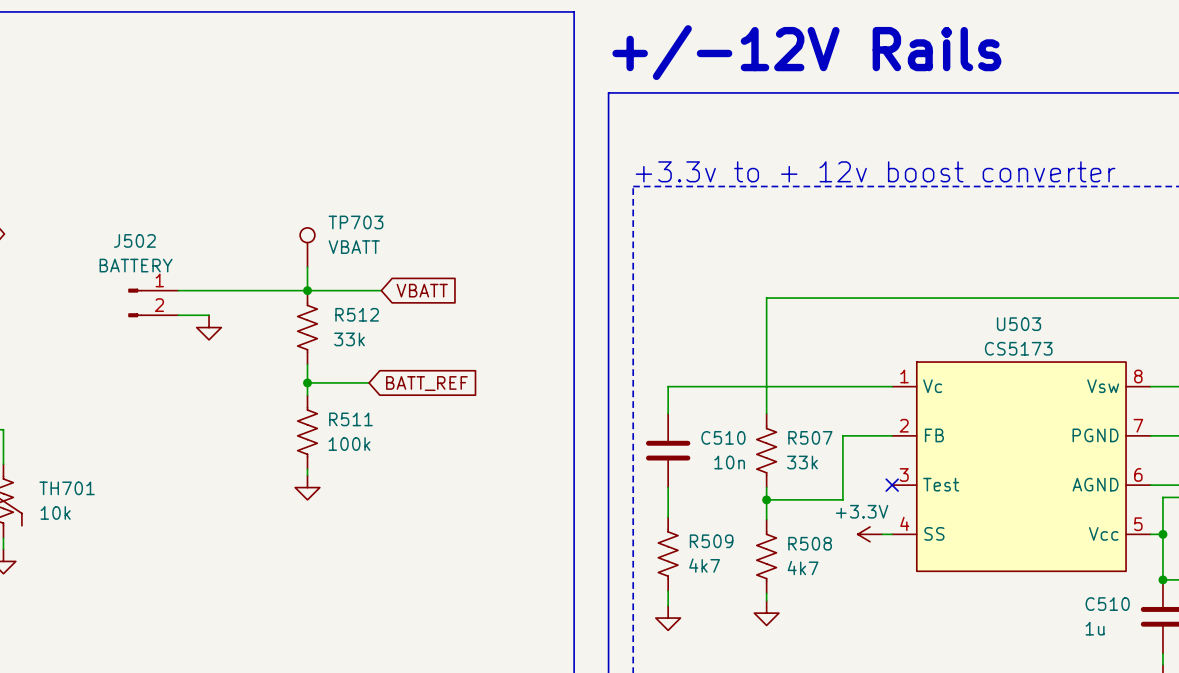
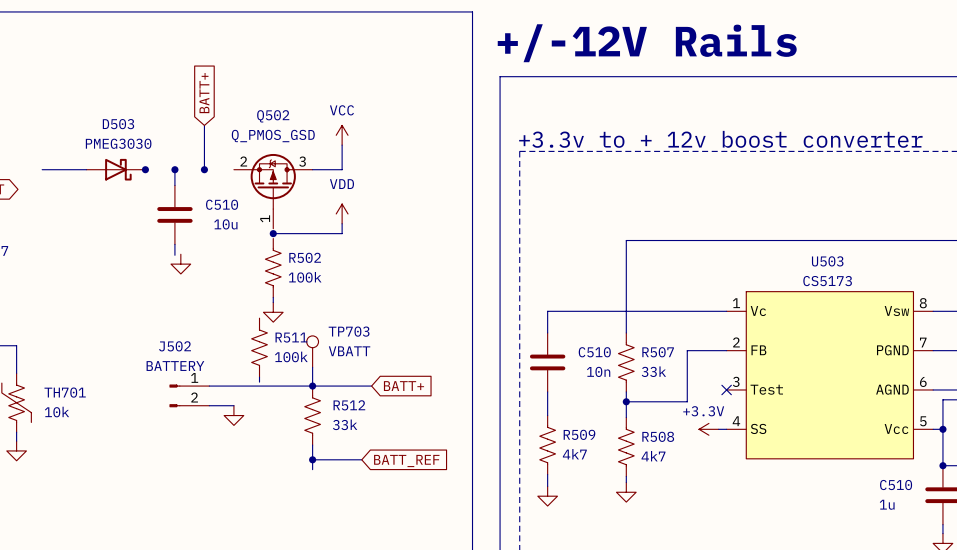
global label: none -> BATT+ (204, 93)
wire: none -> (204, 125) (204, 169)
power symbol: none -> VCC (342, 135)
wire: none -> (342, 145) (342, 169) (312, 169)
wire: none -> (42, 169) (86, 169)
D503: none -> PMEG3030 (115, 169)
junction: none -> (145, 169)
wire: none -> (174, 169) (174, 185)
junction: none -> (174, 169)
junction: none -> (204, 169)
Q502: none -> Q_PMOS_GSD (273, 191)
TP703 position: (307, 247) -> (312, 351)
power symbol: none -> VDD (342, 213)
C510: none -> 10u (174, 214)
wire: (307, 267) (307, 290) -> (312, 367) (312, 386)
wire: none -> (342, 223) (342, 233) (273, 233)
wire: (178, 290) (381, 290) -> (209, 386) (371, 386)
junction position: (307, 290) -> (273, 233)
global label: VBATT (422, 290) -> none
J502 position: (153, 302) -> (189, 395)
wire: none -> (174, 244) (174, 255)
wire: (178, 315) (209, 315) -> (209, 405) (233, 405)
R512 position: (307, 327) -> (312, 415)
R502: none -> 100k (273, 268)
wire: (307, 364) (307, 395) -> (312, 445) (312, 469)
wire: none -> (273, 297) (273, 302)
wire: (307, 382) (369, 382) -> (312, 459) (361, 459)
junction: (307, 382) -> none
global label position: BATT_REF (426, 383) -> BATT_REF (406, 461)
power symbol: none -> (273, 312)
junction: none -> (312, 386)
global label: none -> BATT+ (403, 386)
power symbol position: (307, 487) -> (233, 415)
junction: none -> (312, 459)

